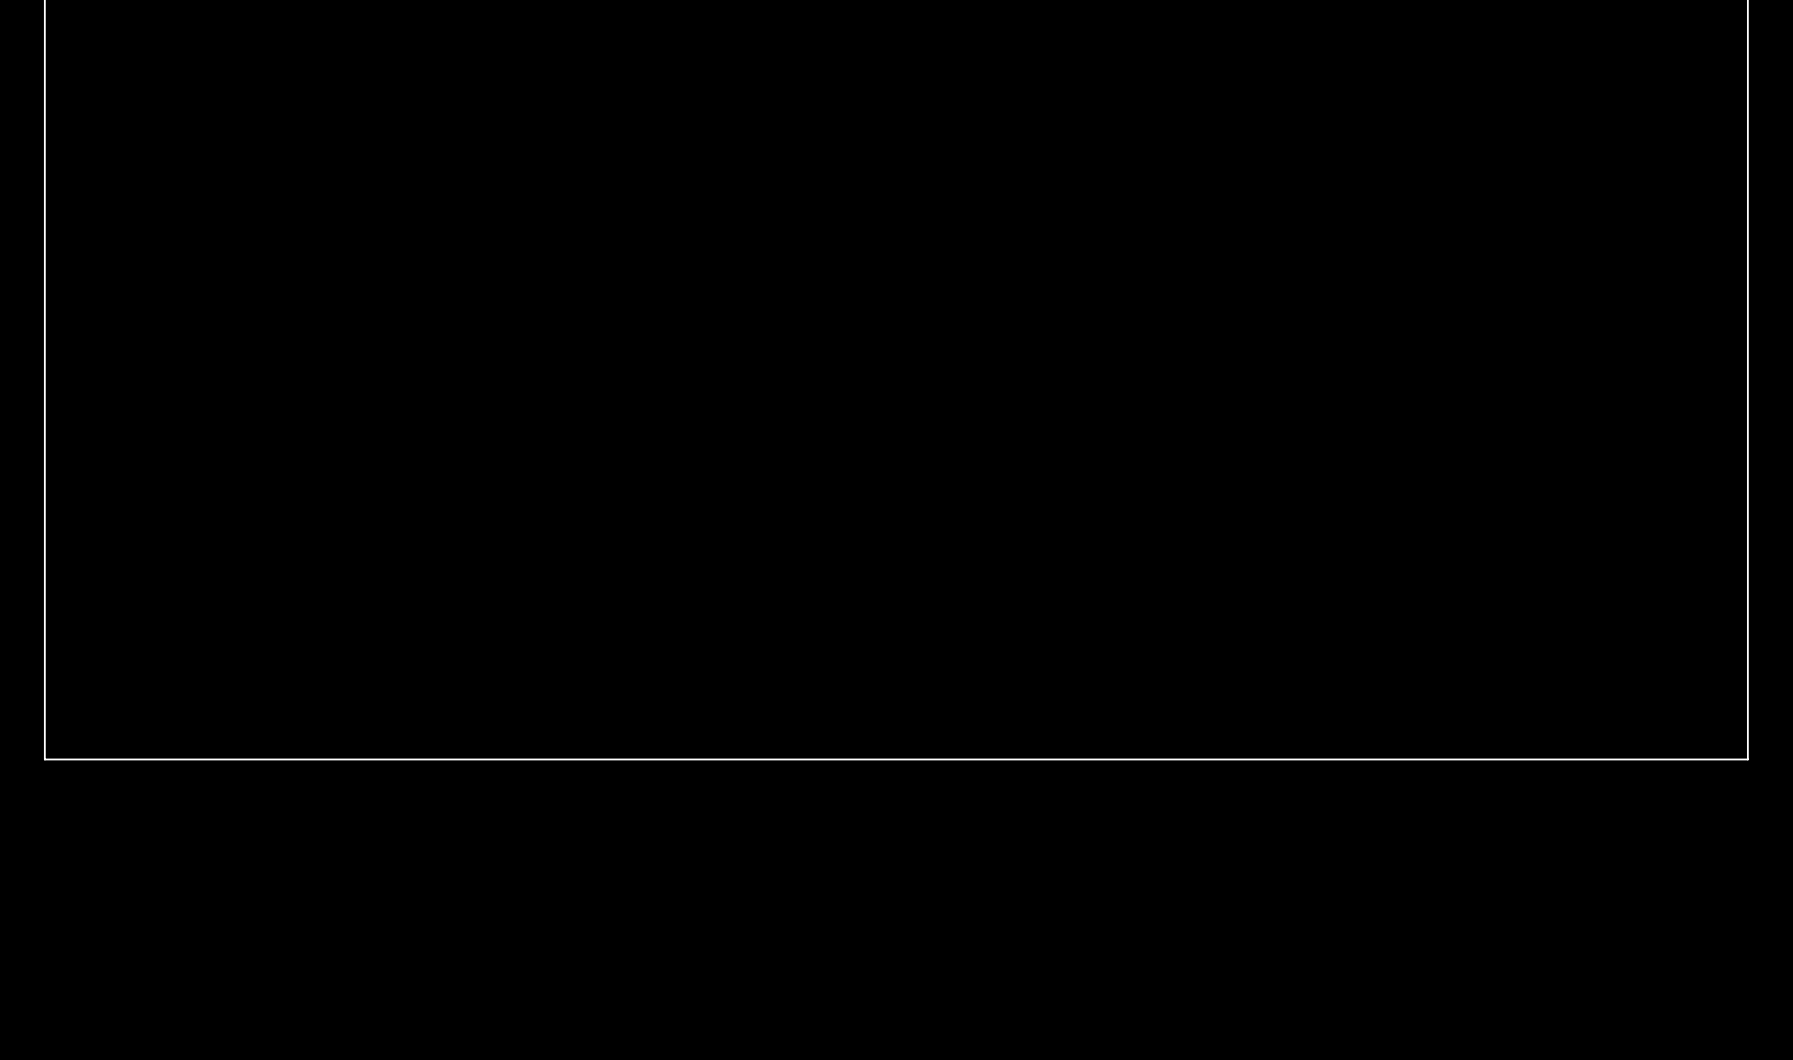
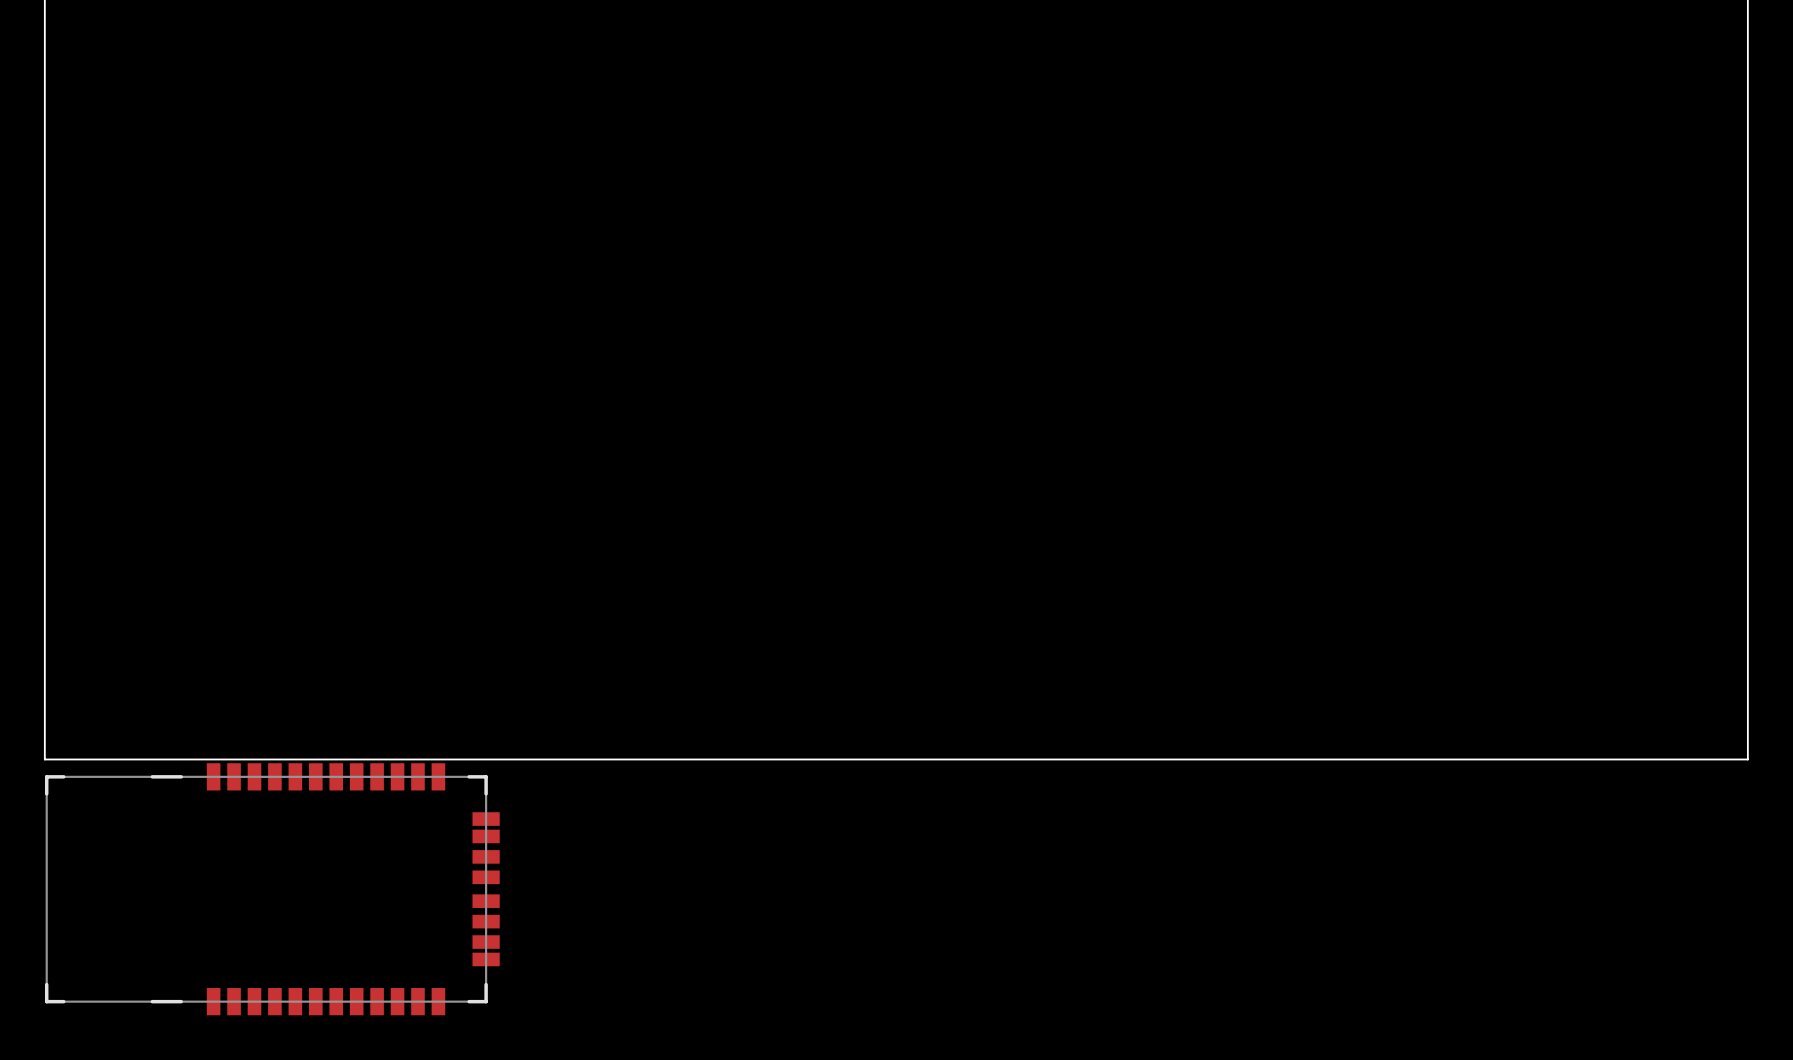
part: none -> (272, 889)

